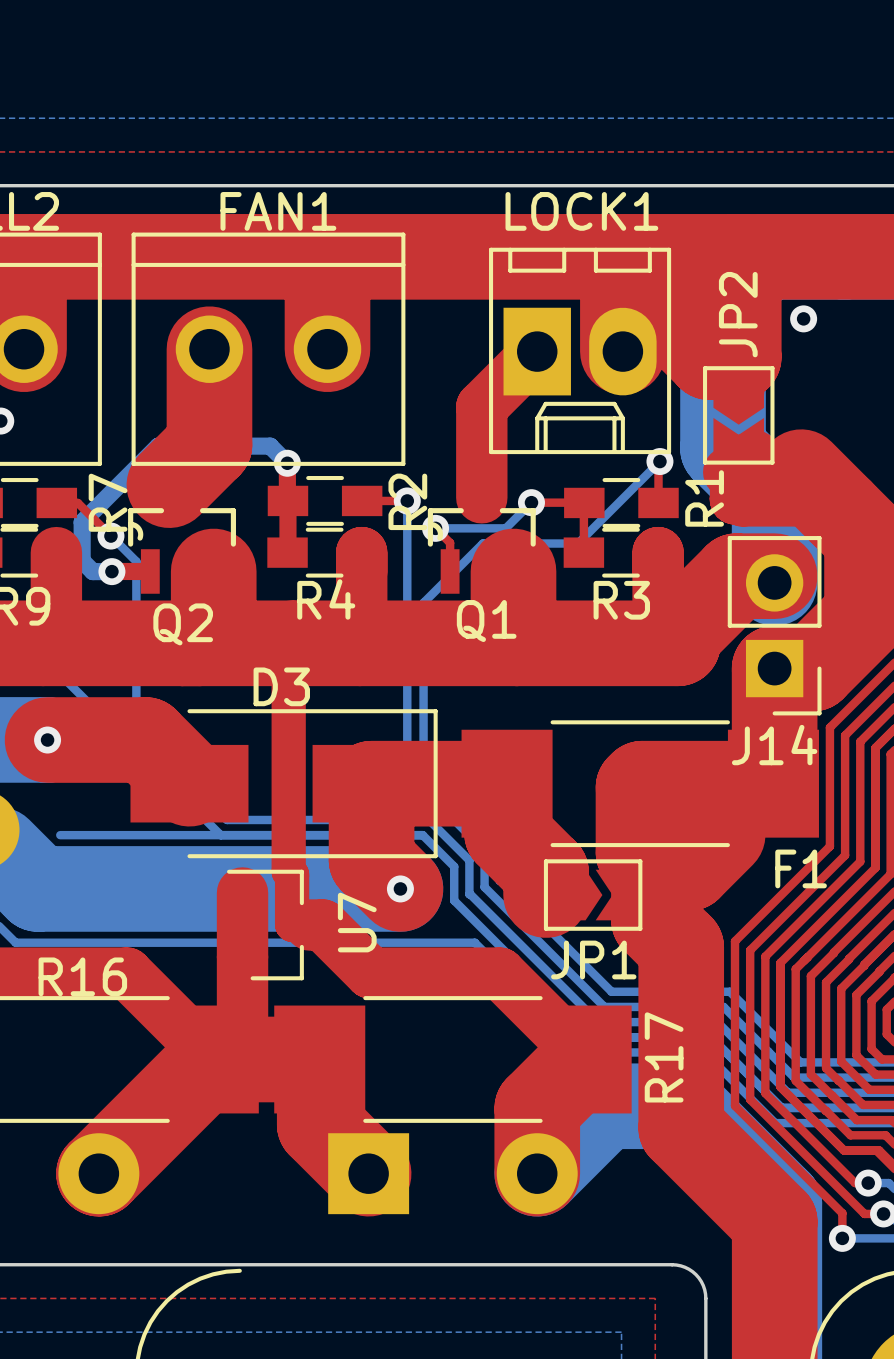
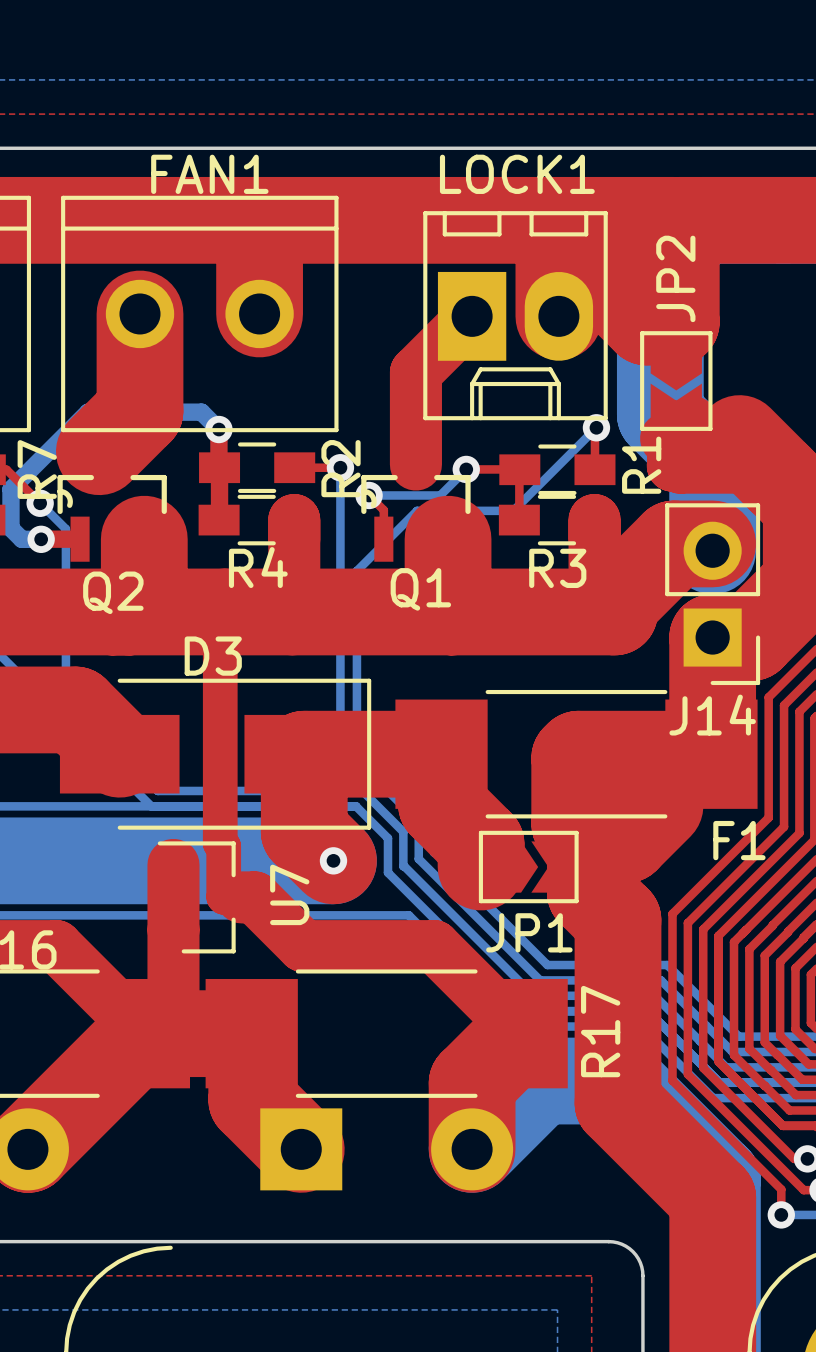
via: (803, 318) -> none

